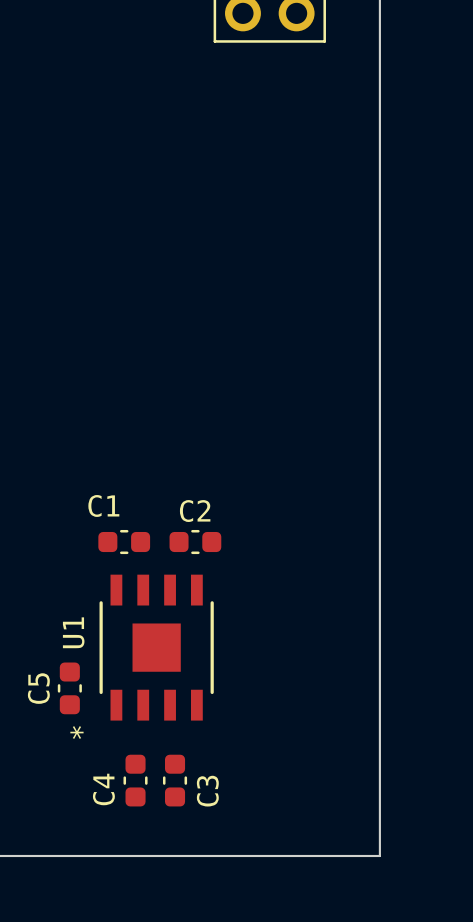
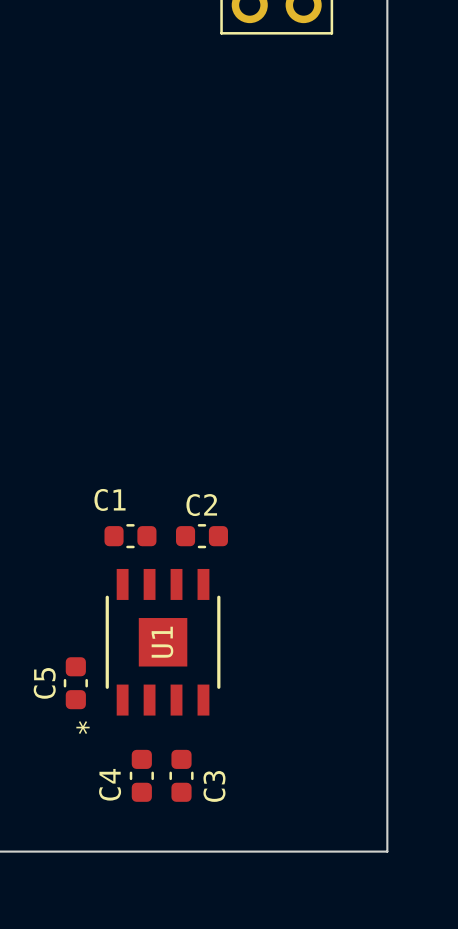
U1 name position: U1 (73, 632) -> U1 (162, 642)

